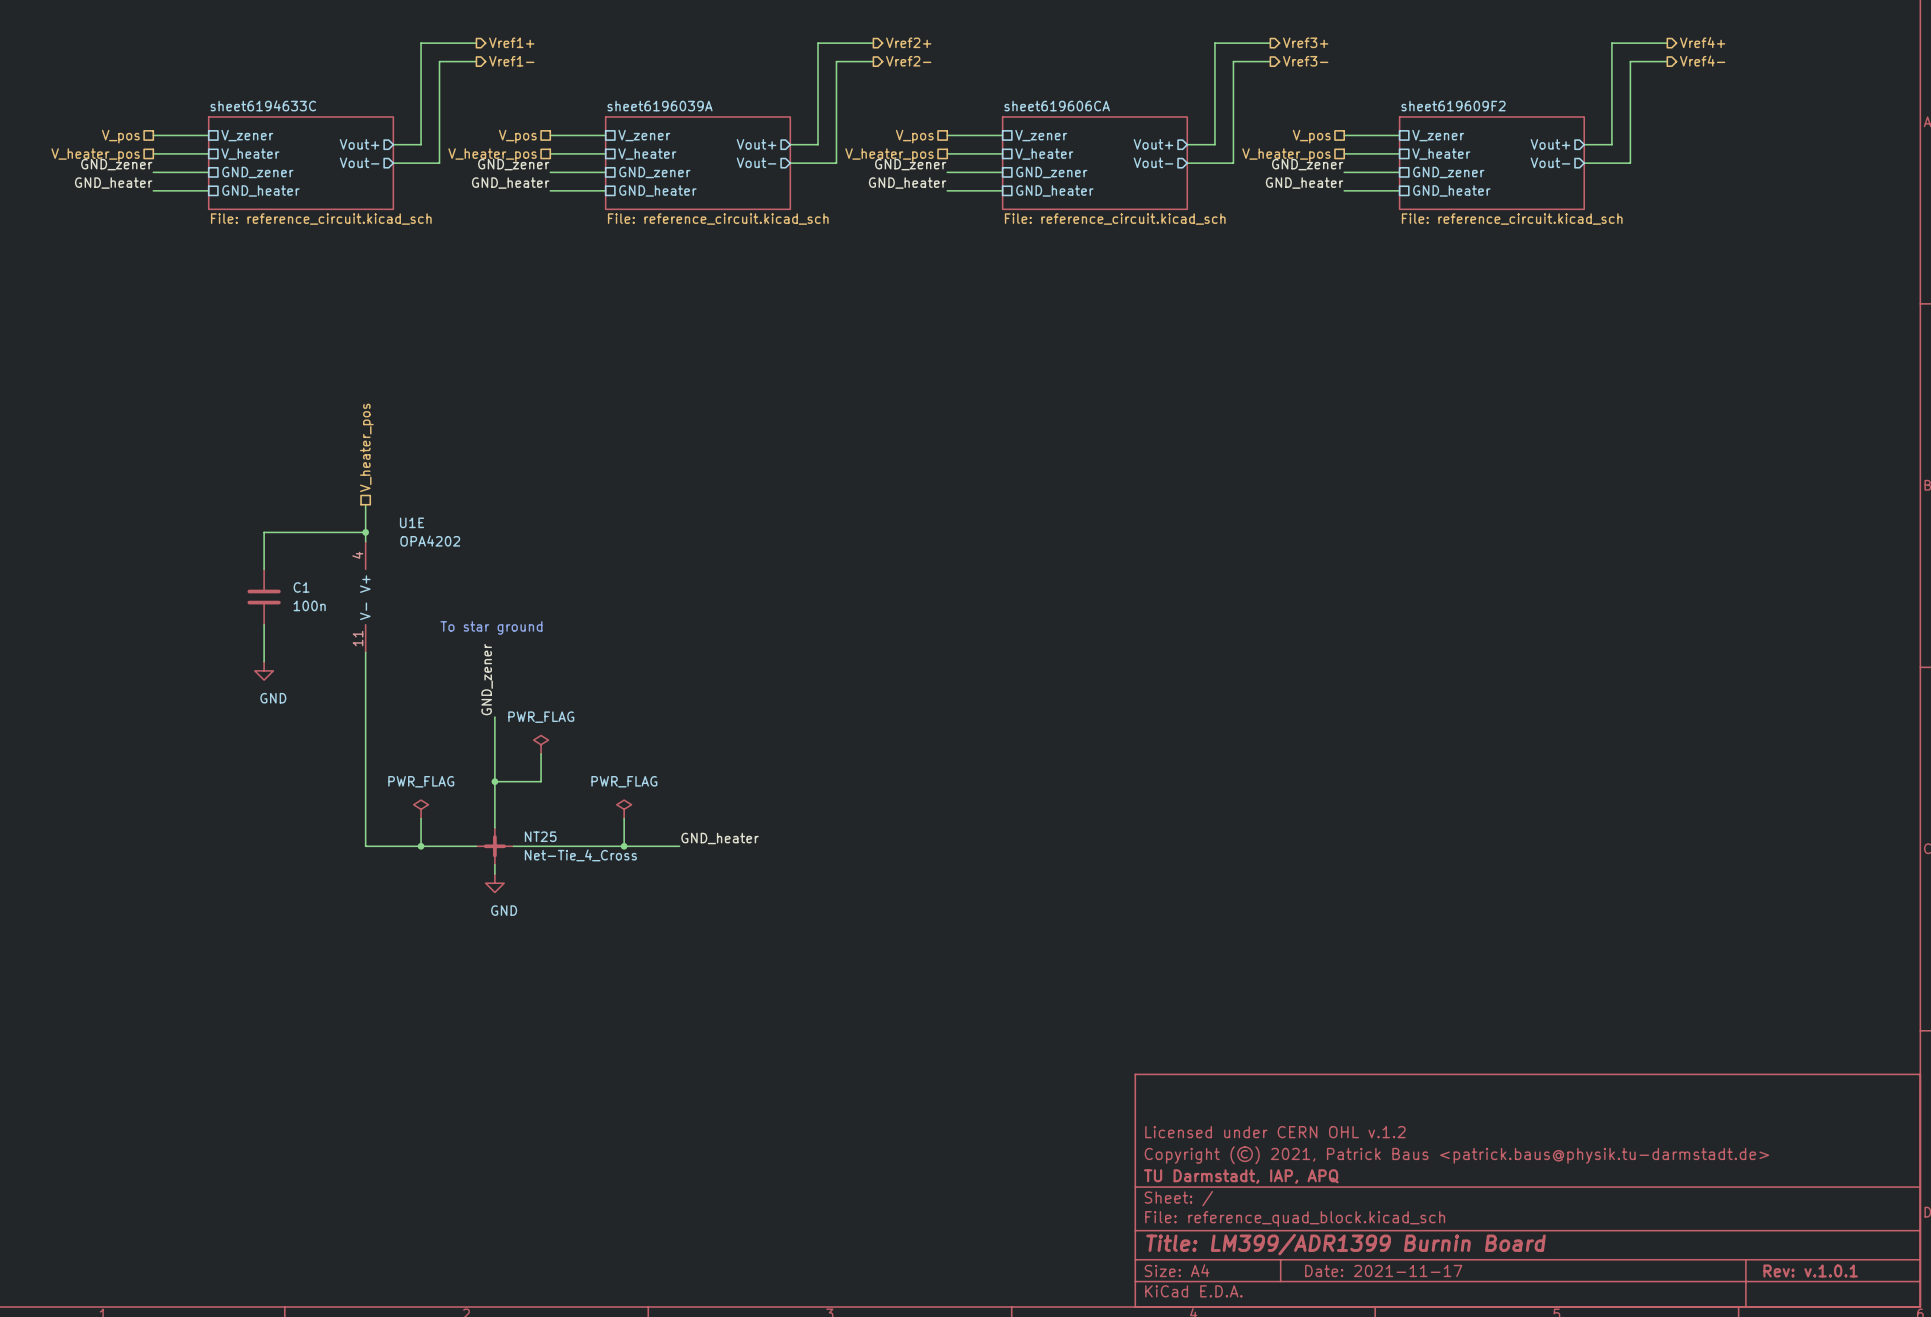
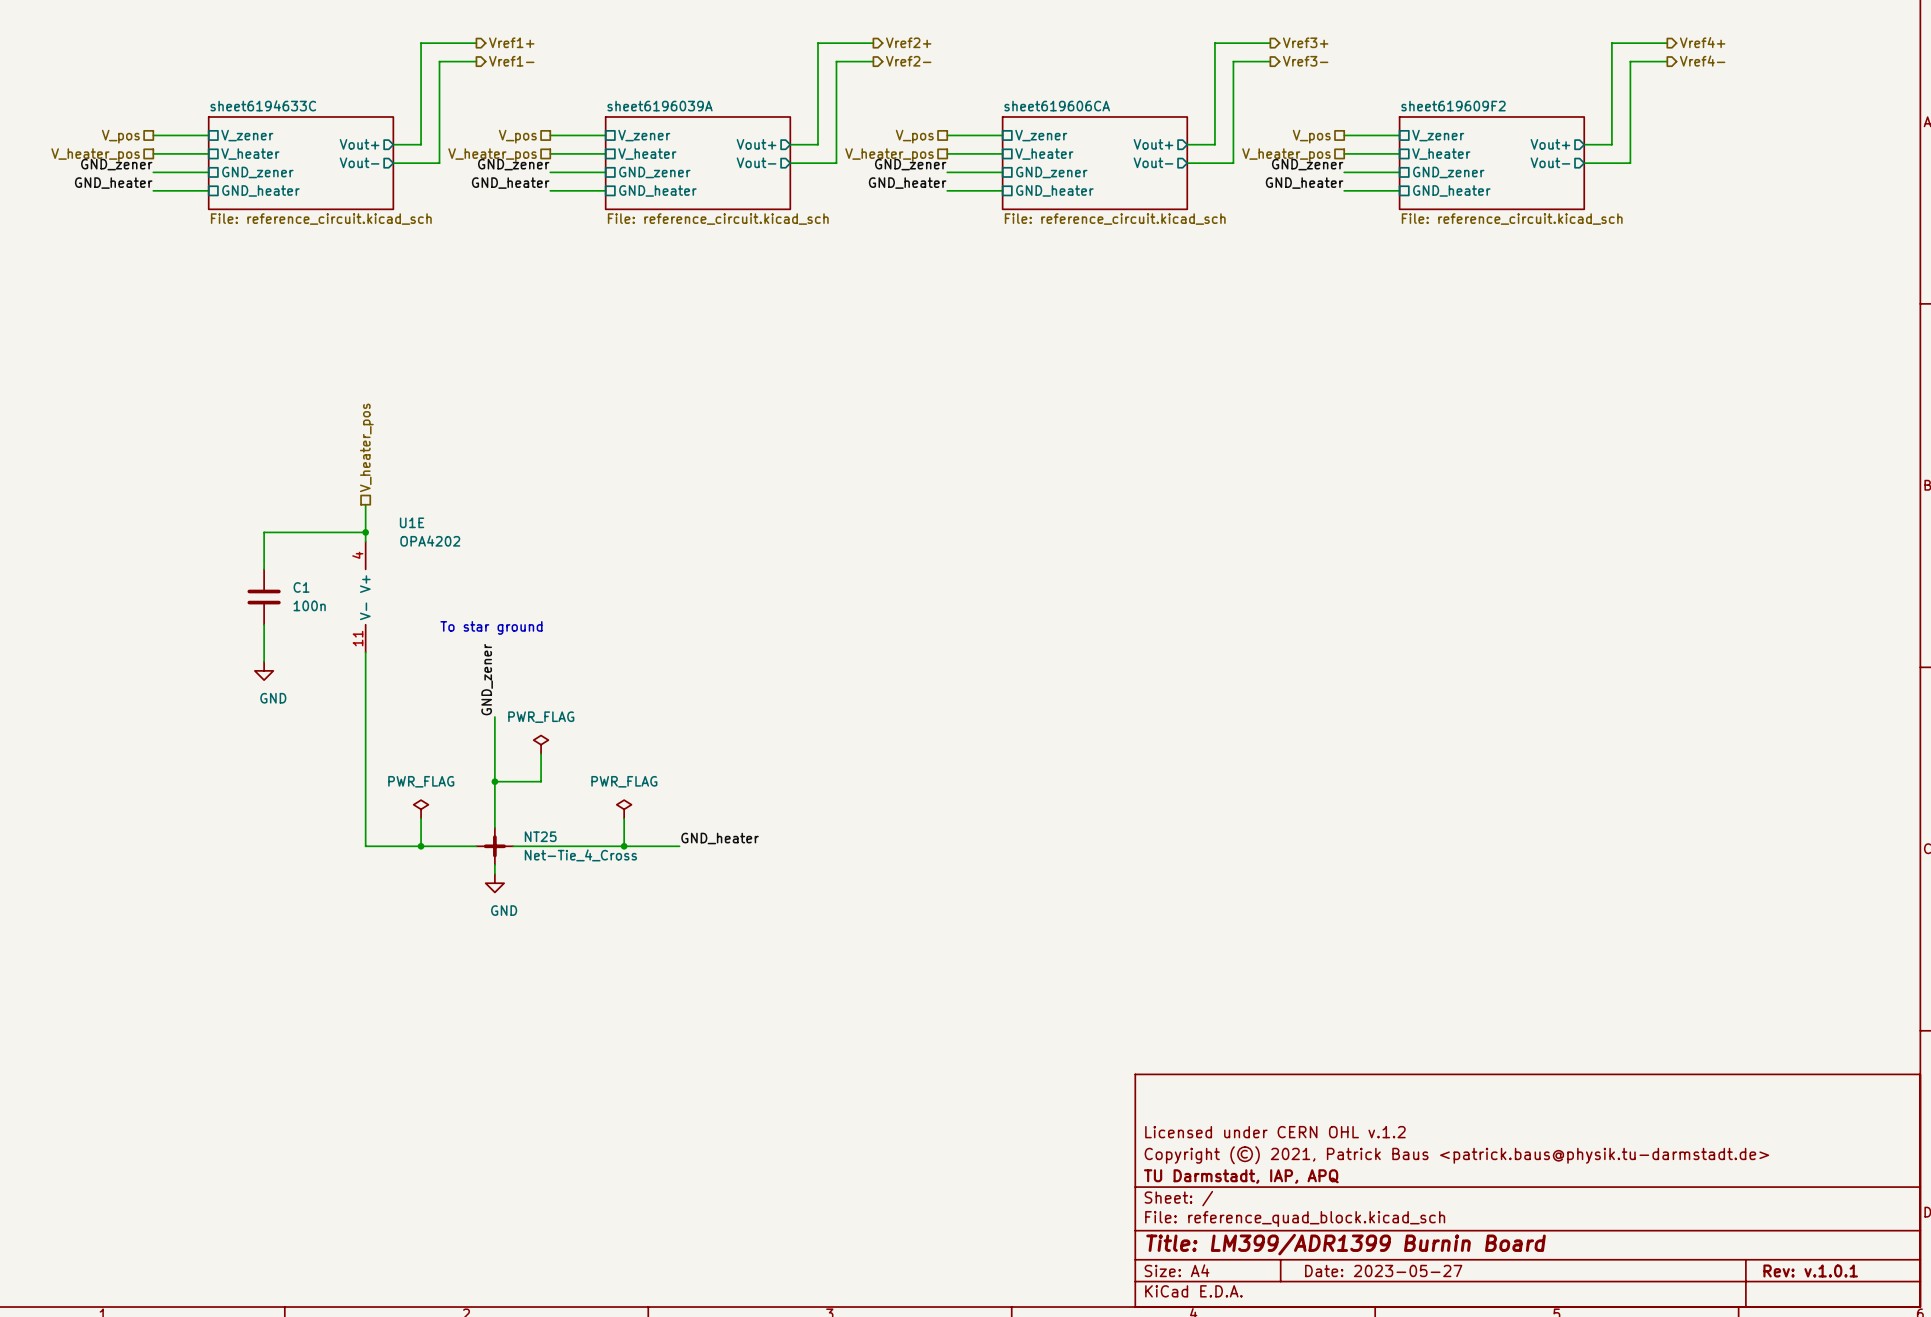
title block: Date: 2021-11-17 (1383, 1270) -> Date: 2023-05-27 (1383, 1270)

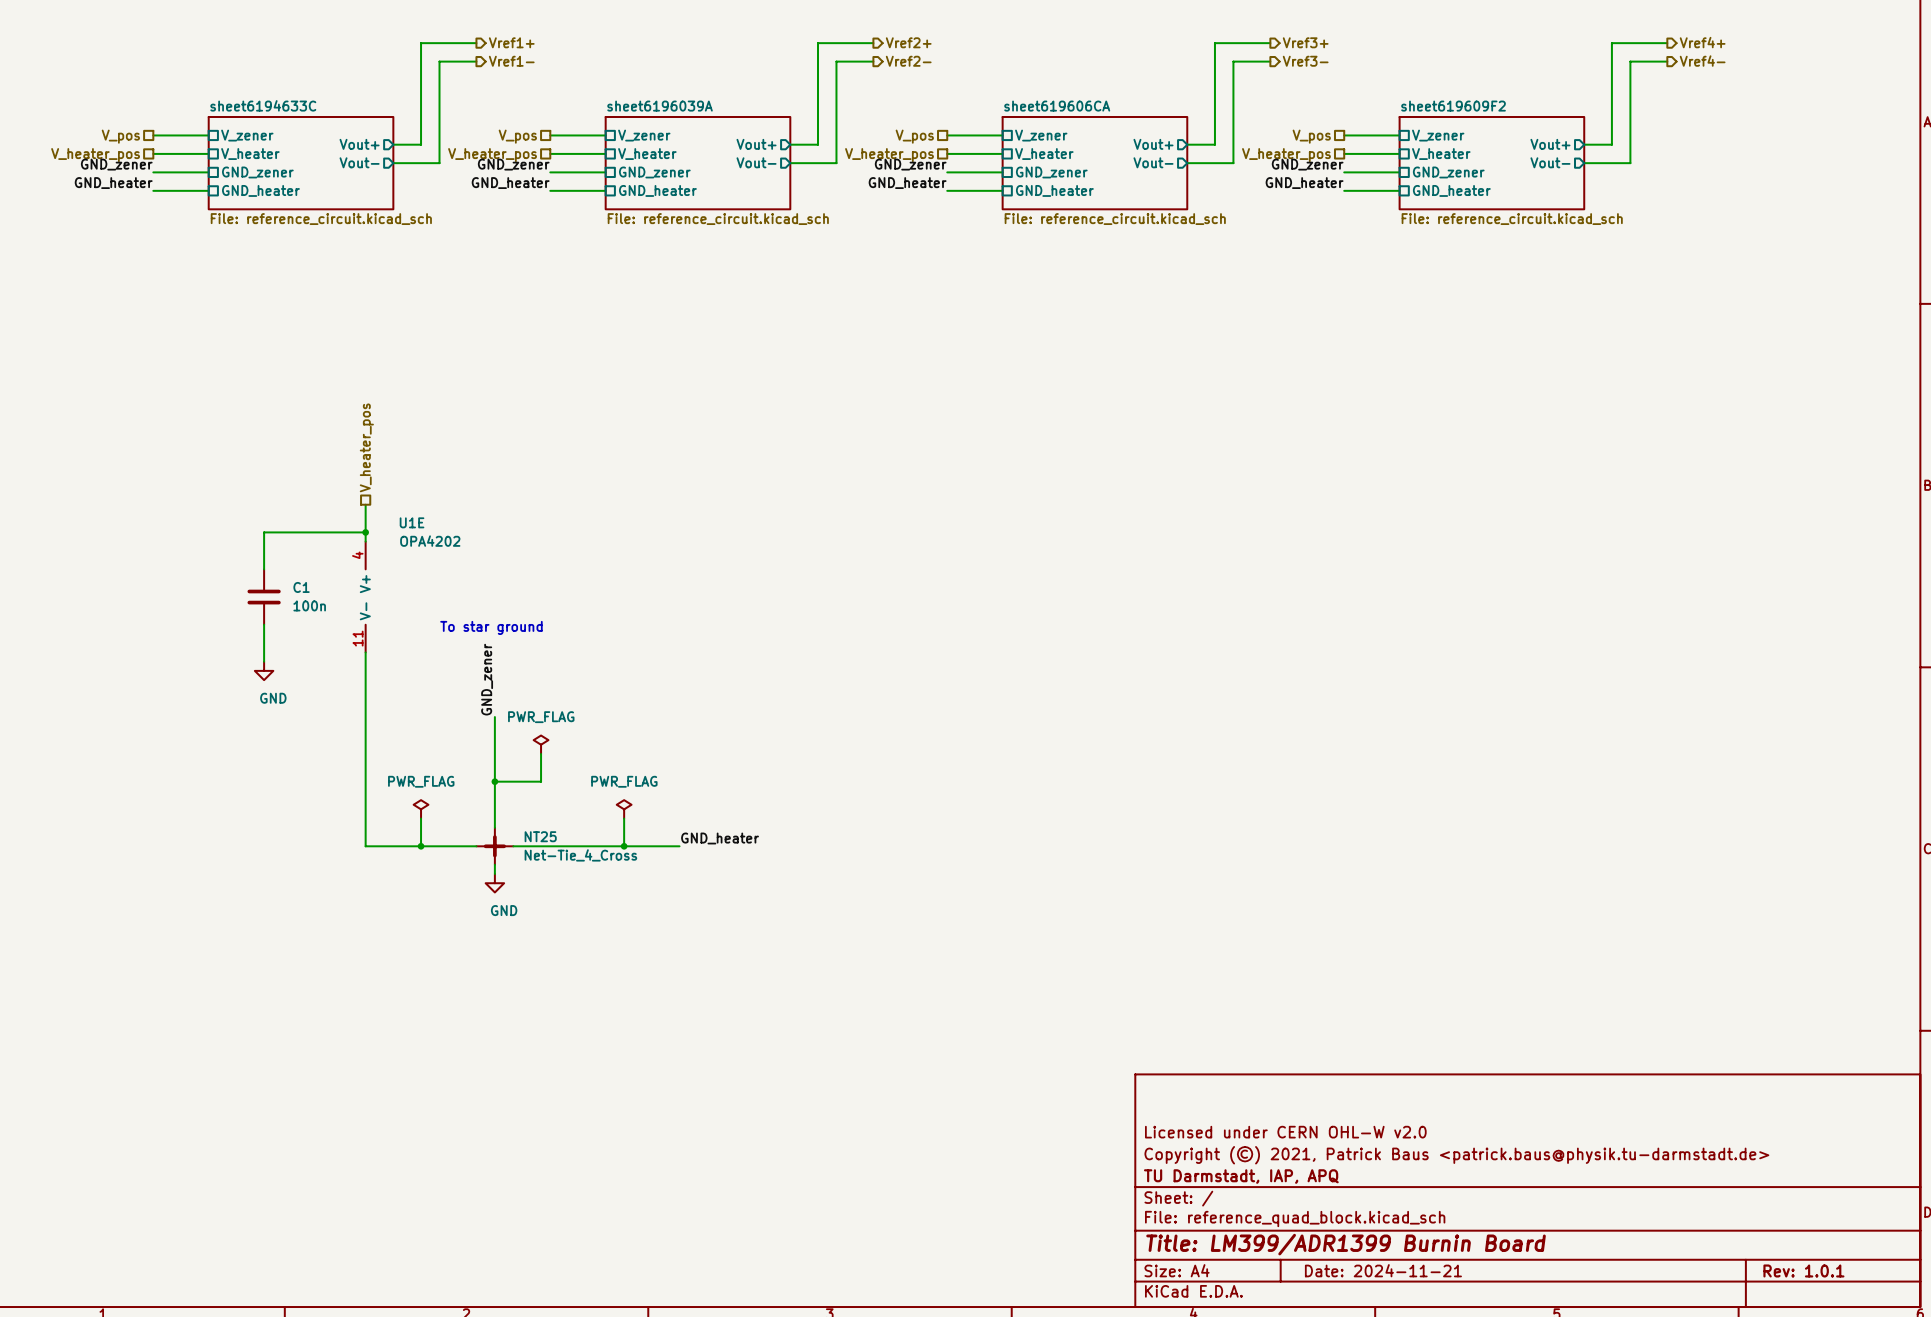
title block: Licensed under CERN OHL v.1.2 (1275, 1132) -> Licensed under CERN OHL-W v2.0 (1285, 1132)
title block: Date: 2023-05-27 (1383, 1270) -> Date: 2024-11-21 (1383, 1270)
title block: Rev: v.1.0.1 (1810, 1270) -> Rev: 1.0.1 (1803, 1270)

